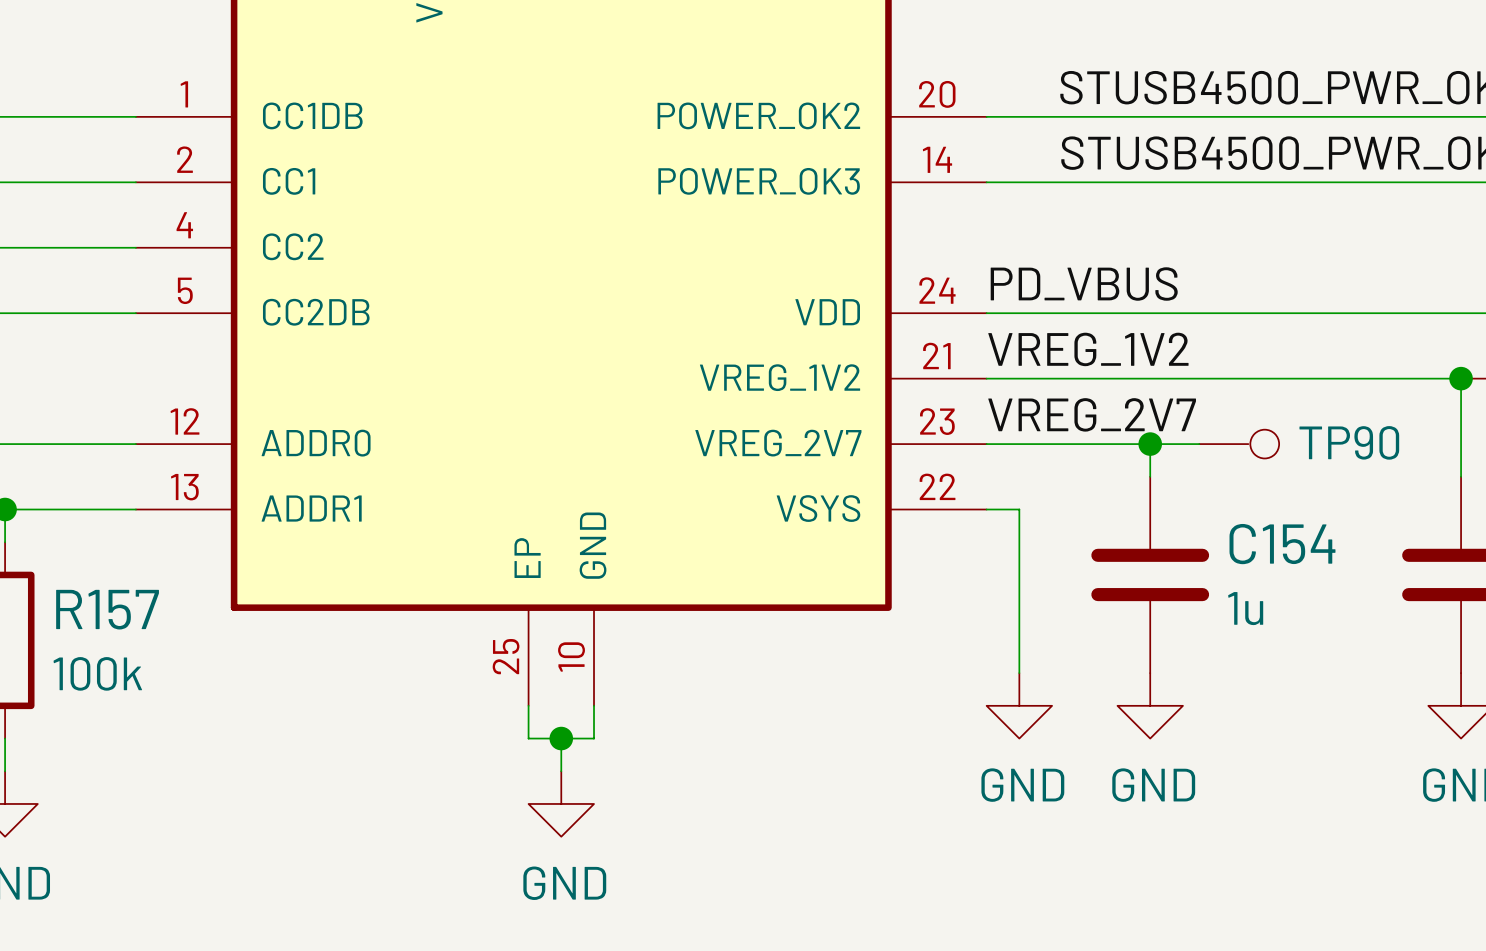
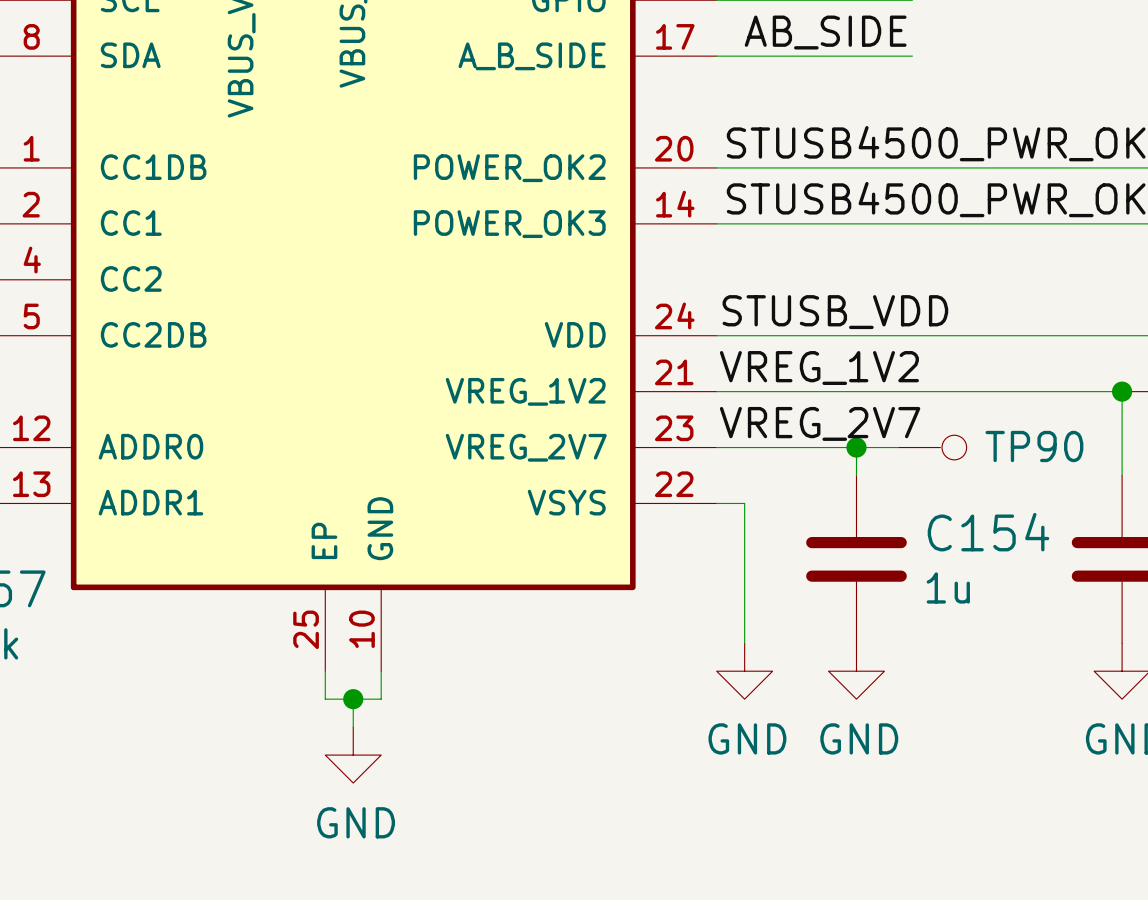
label: PD_VBUS (1084, 284) -> STUSB_VDD (835, 312)

